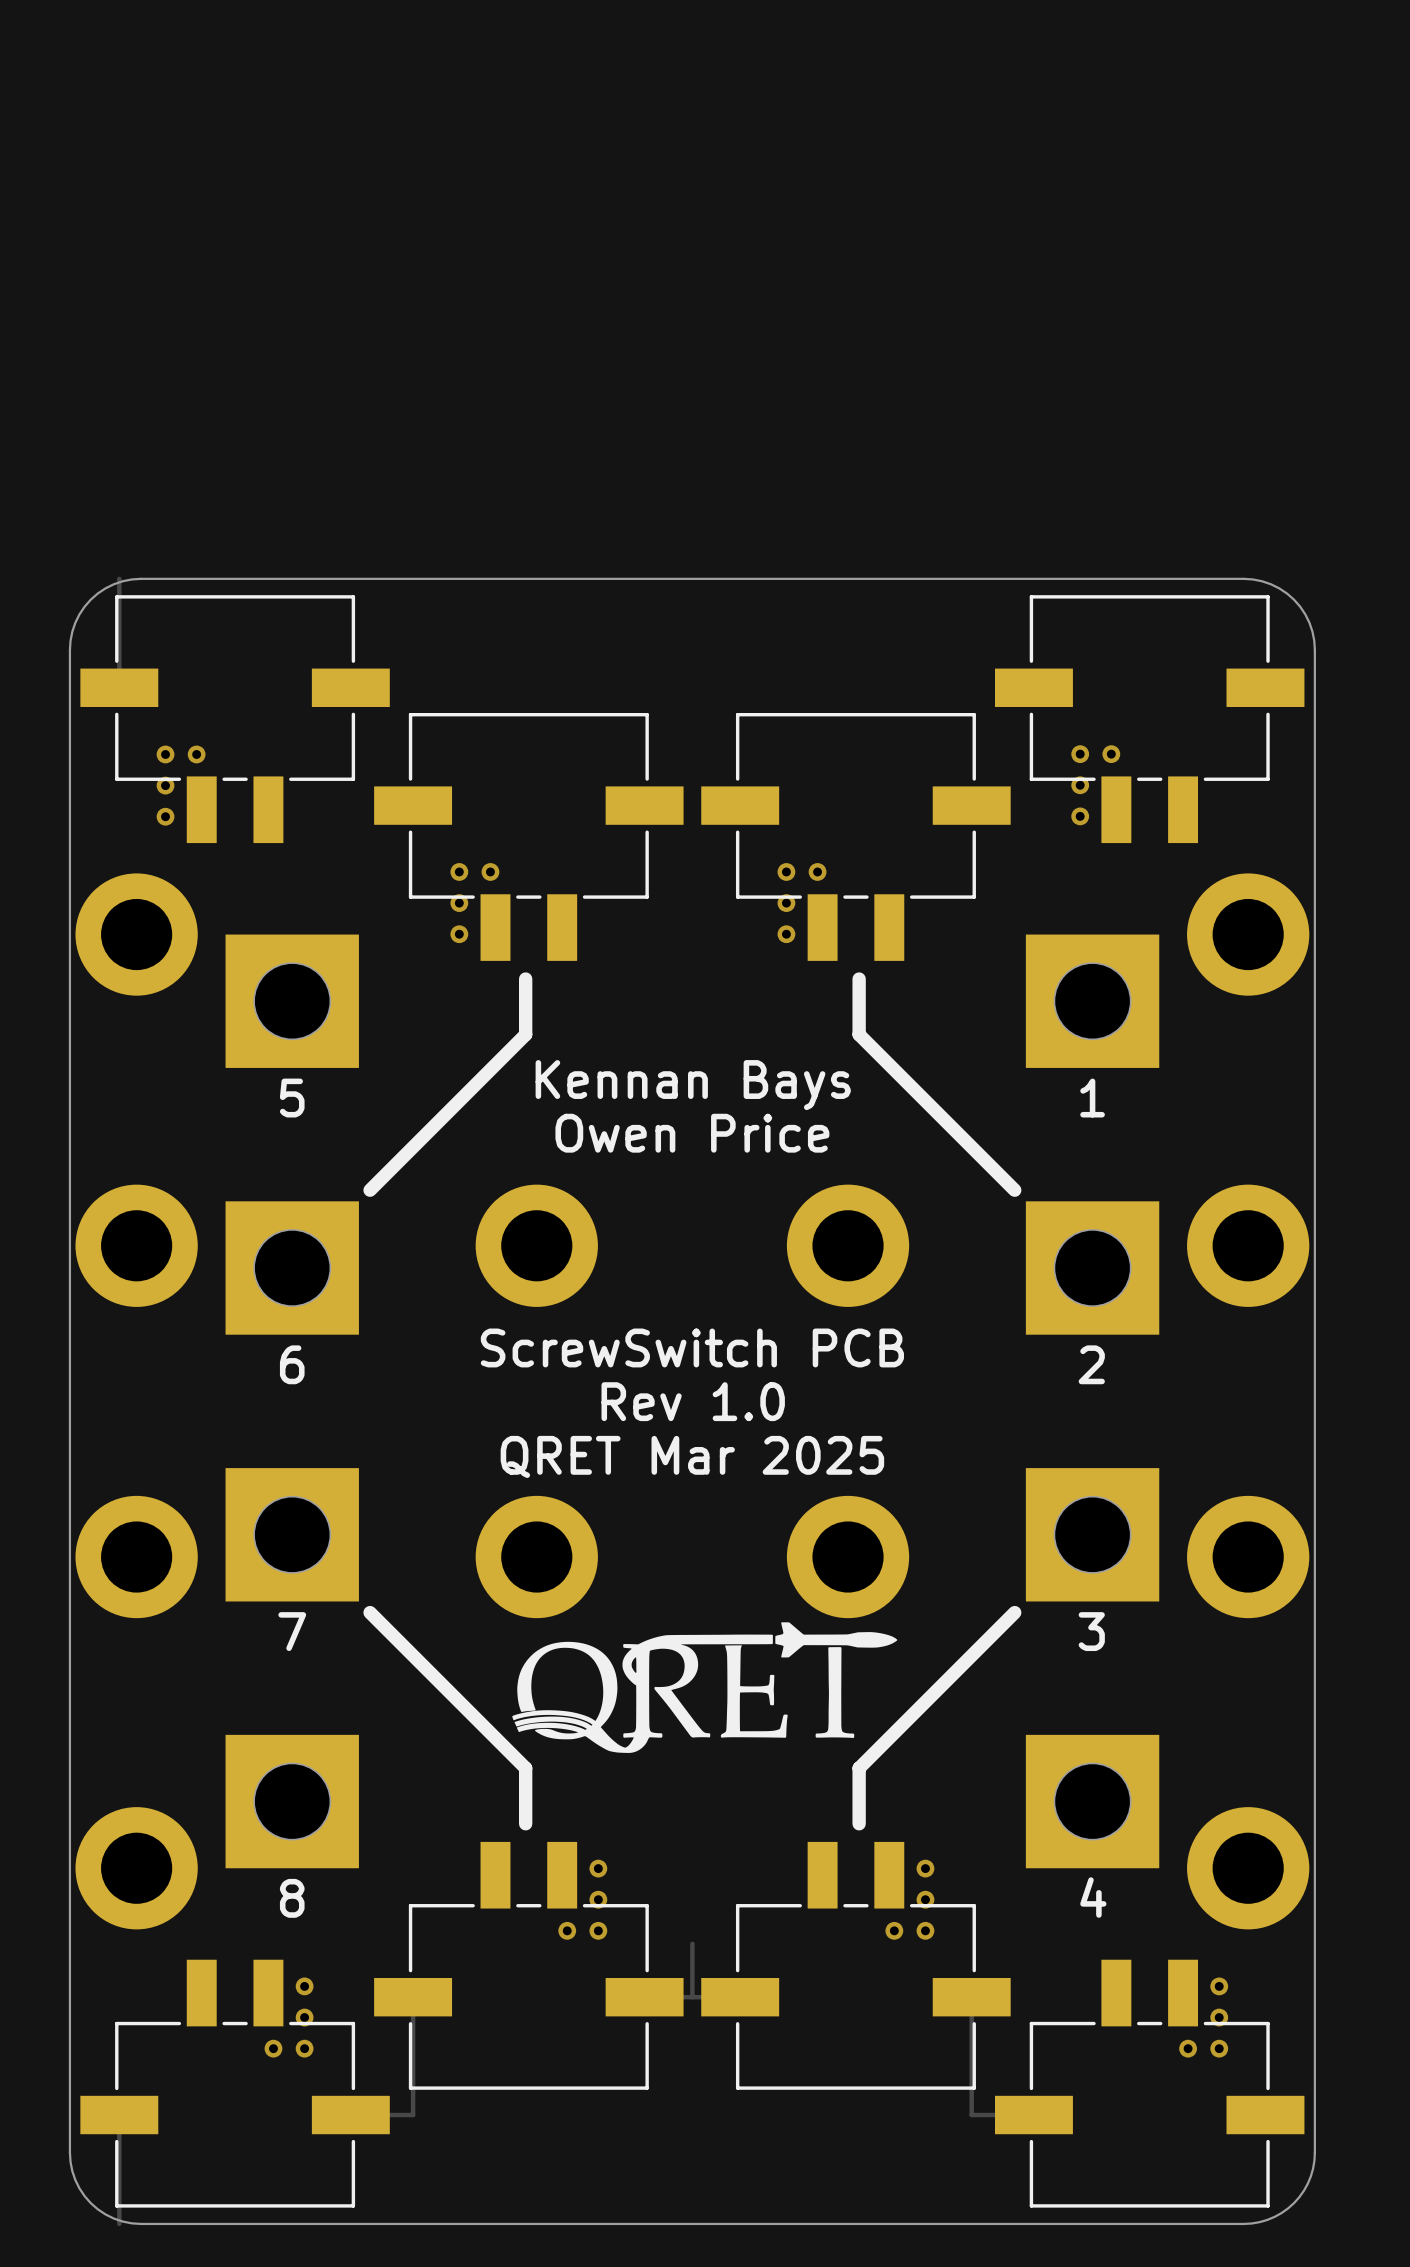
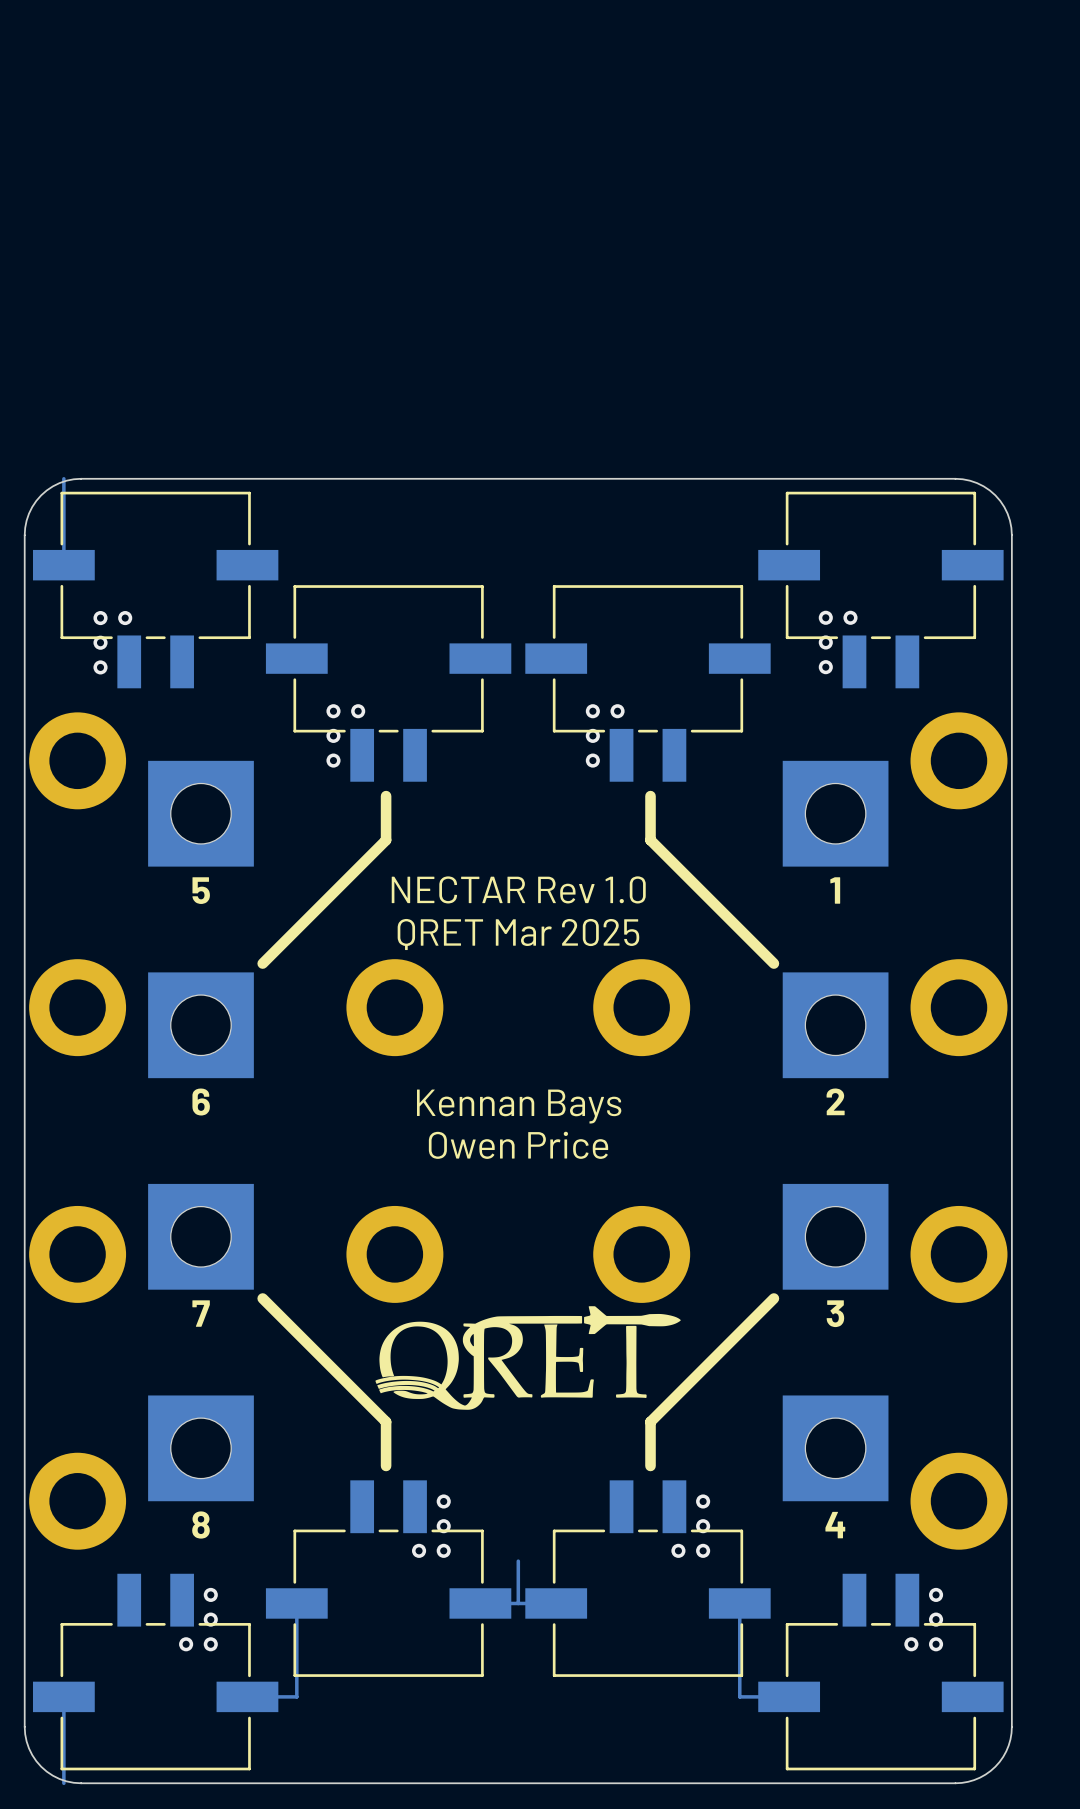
text position: Kennan Bays (693, 1085) -> Kennan Bays (519, 1106)
text: none -> NECTAR Rev 1.0 (518, 889)
text position: Owen Price (692, 1133) -> Owen Price (518, 1145)
text: ScrewSwitch PCB (692, 1347) -> none
text: Rev 1.0 (693, 1401) -> none
text position: QRET Mar 2025 (692, 1456) -> QRET Mar 2025 (518, 934)

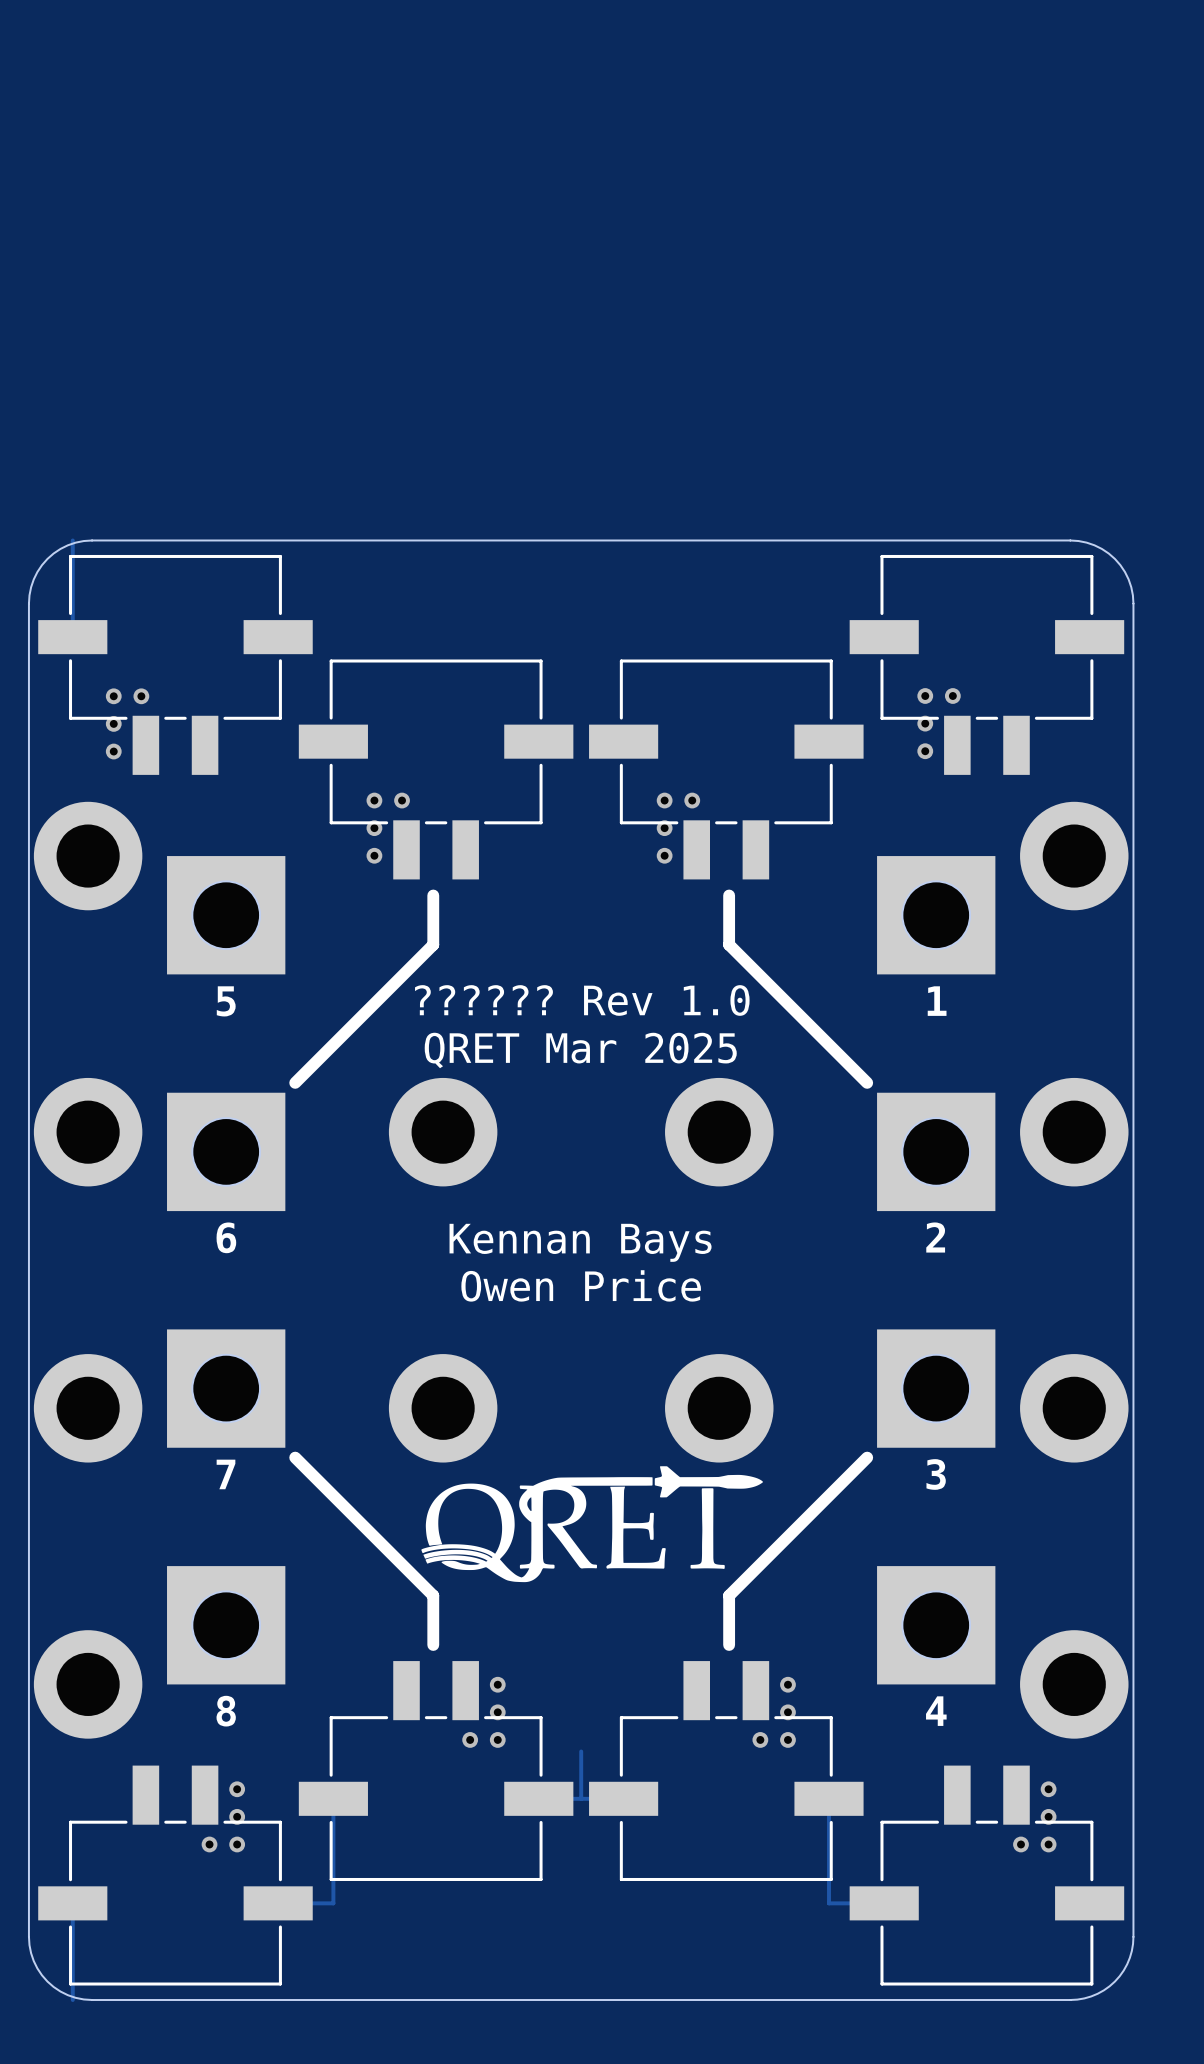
text: NECTAR Rev 1.0 (518, 889) -> ?????? Rev 1.0 (582, 1000)

